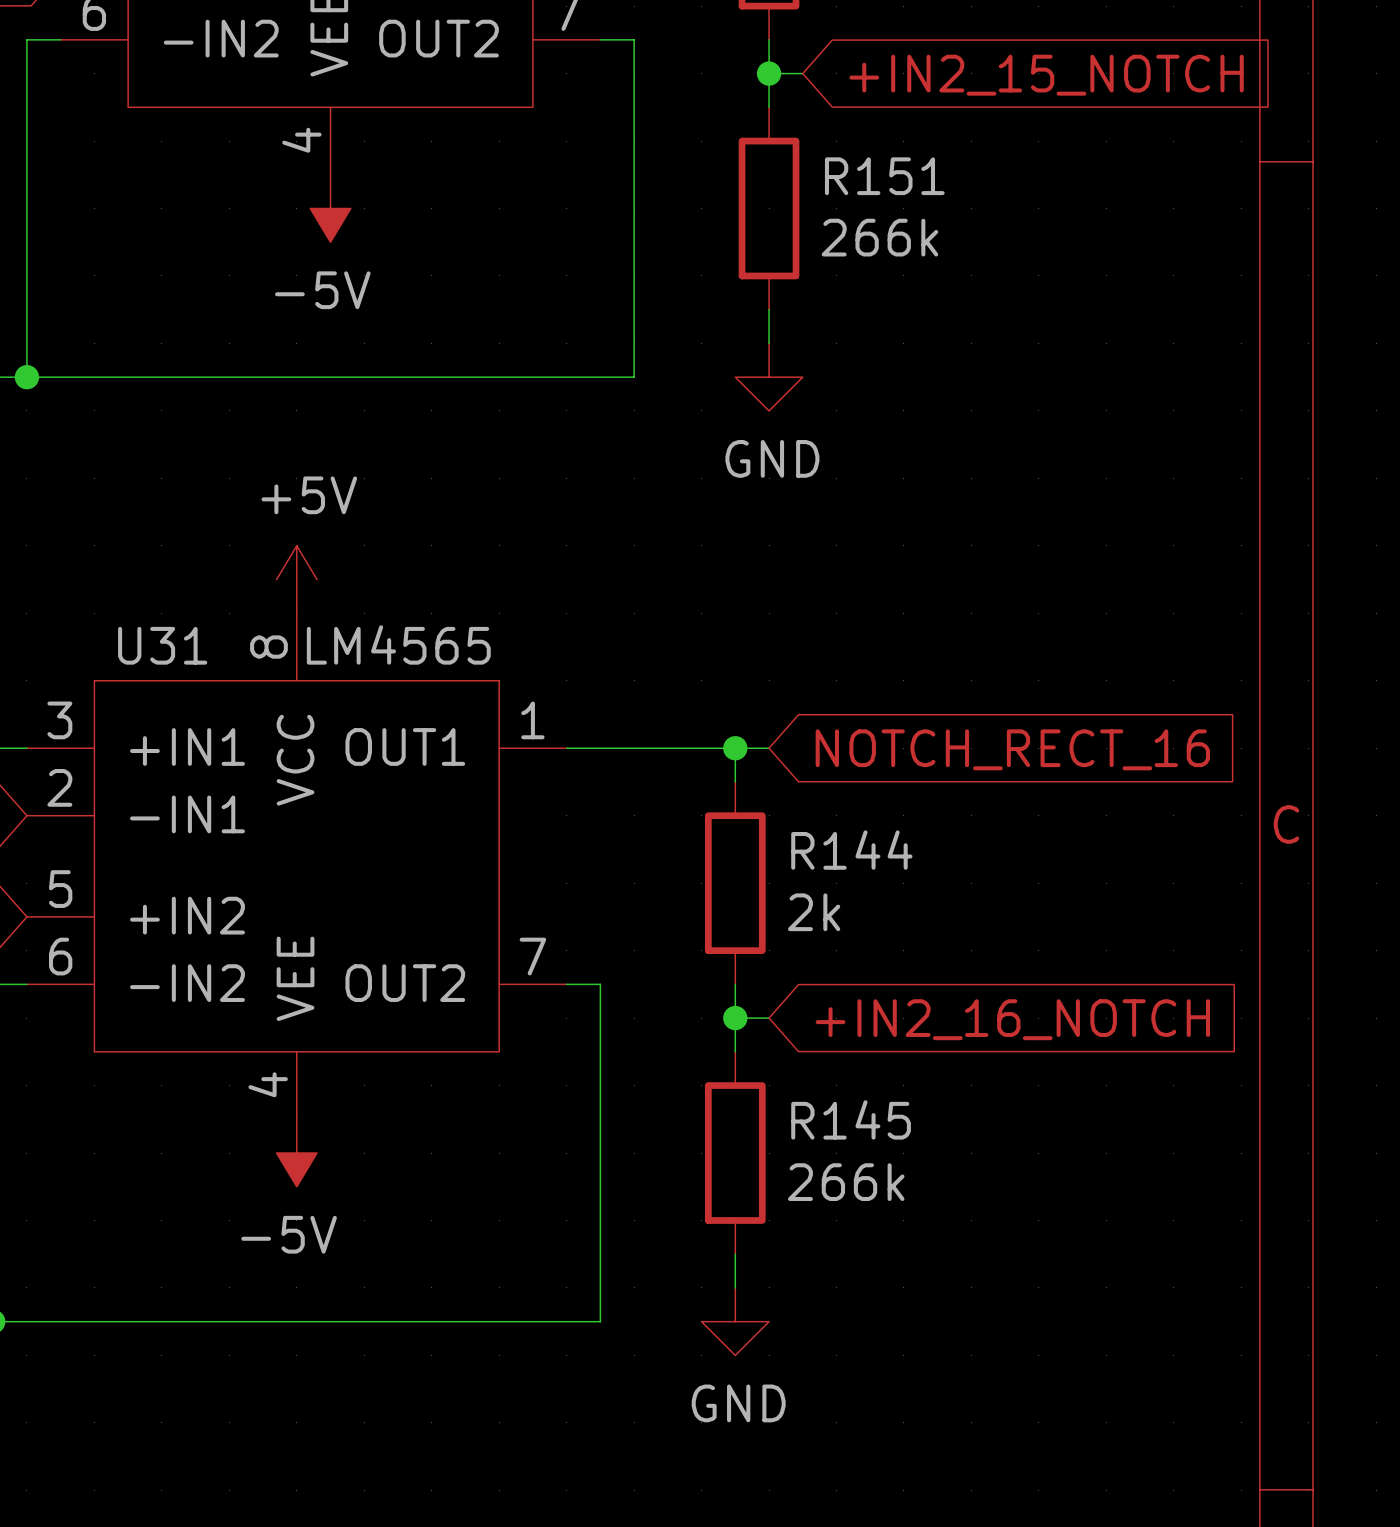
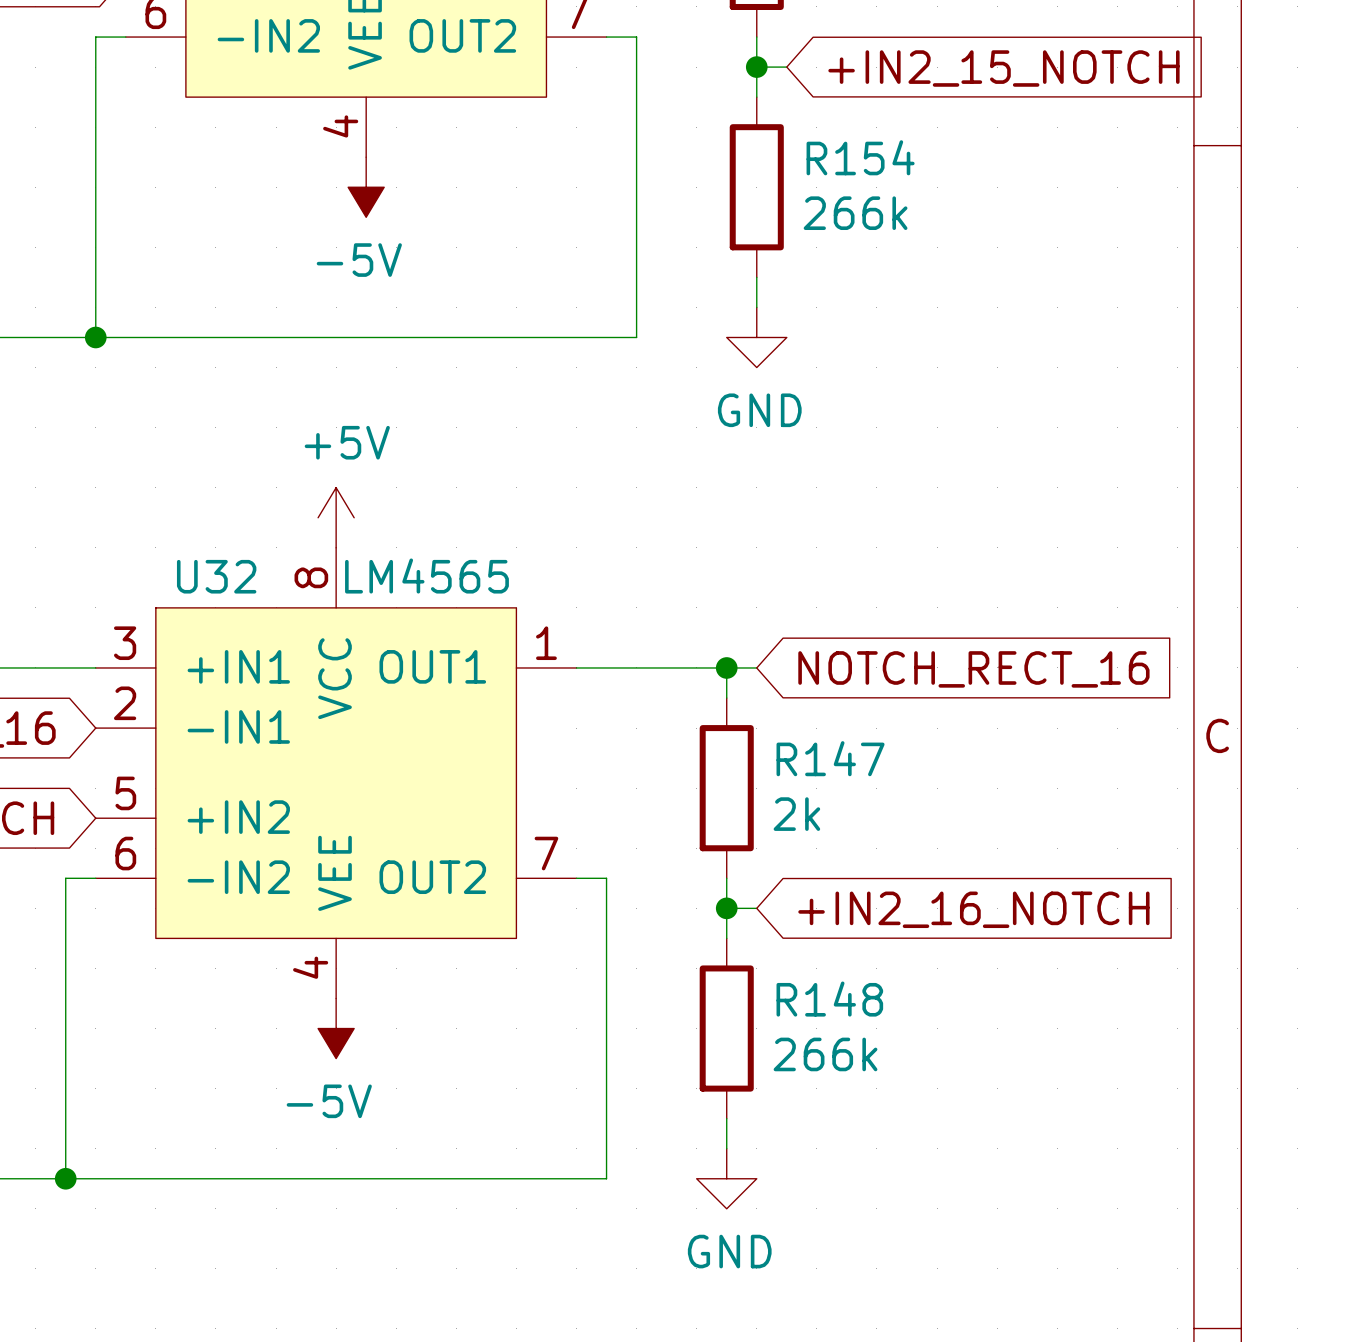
R151 name: R151 (884, 176) -> R154 (860, 157)
U31 name: U31 (162, 645) -> U32 (216, 576)
R144 name: R144 (851, 850) -> R147 (830, 758)
R145 name: R145 (851, 1119) -> R148 (829, 999)

